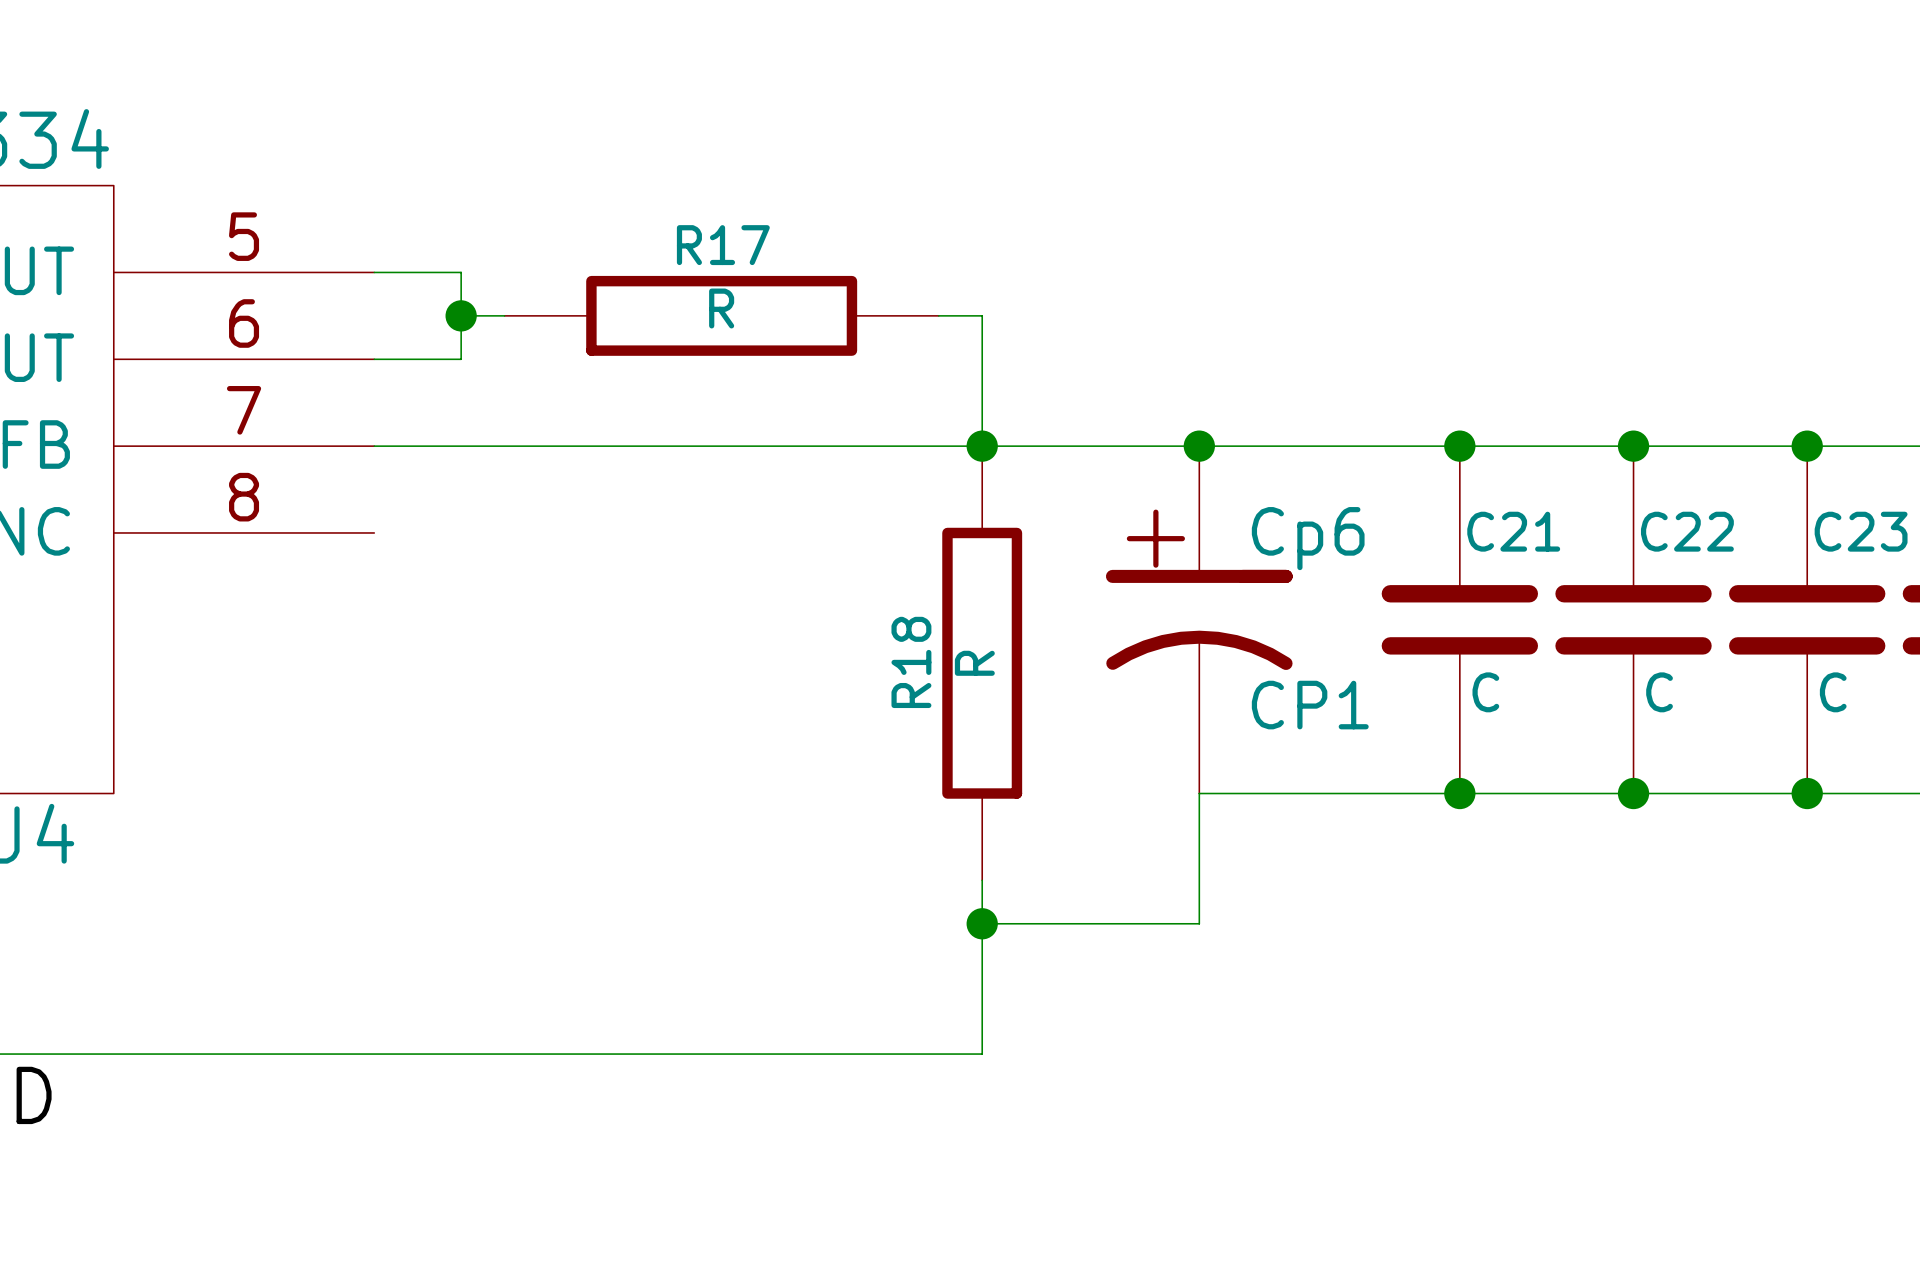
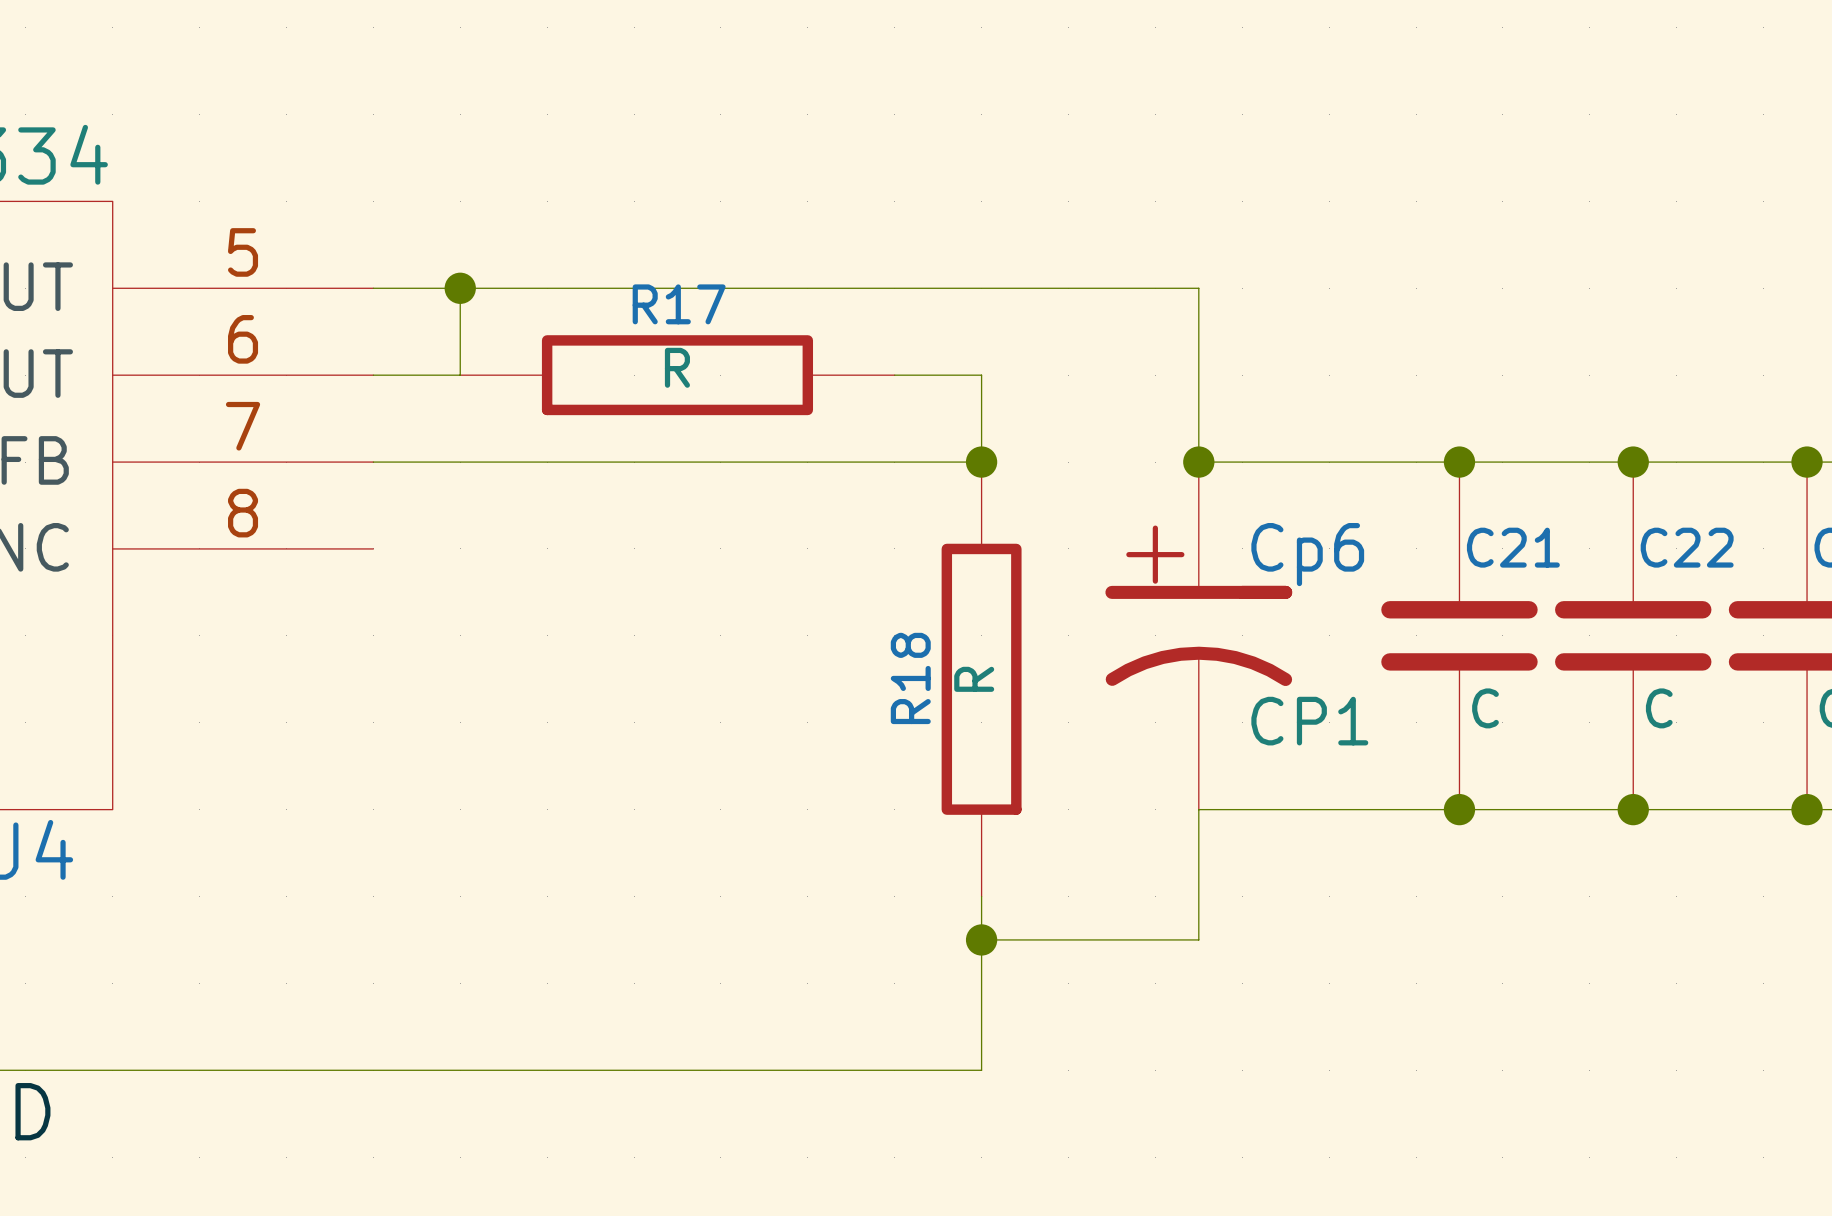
wire: (461, 315) (504, 315) -> none
junction position: (461, 315) -> (460, 288)
R17 position: (721, 315) -> (677, 375)
wire: (938, 315) (982, 315) (982, 359) -> (894, 375) (981, 375)
wire: (982, 446) (1199, 446) -> (460, 288) (1198, 288) (1198, 462)

